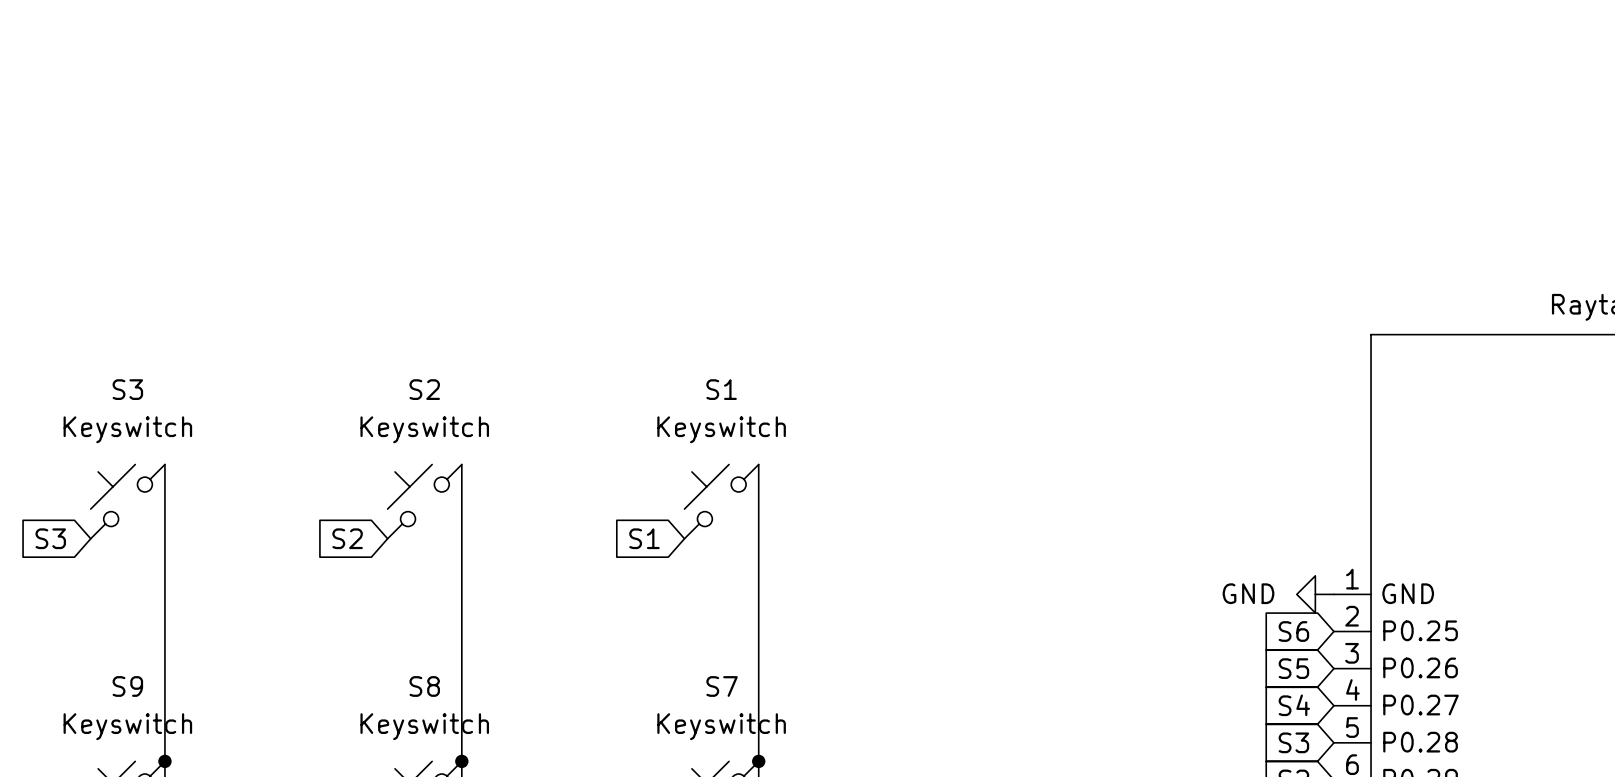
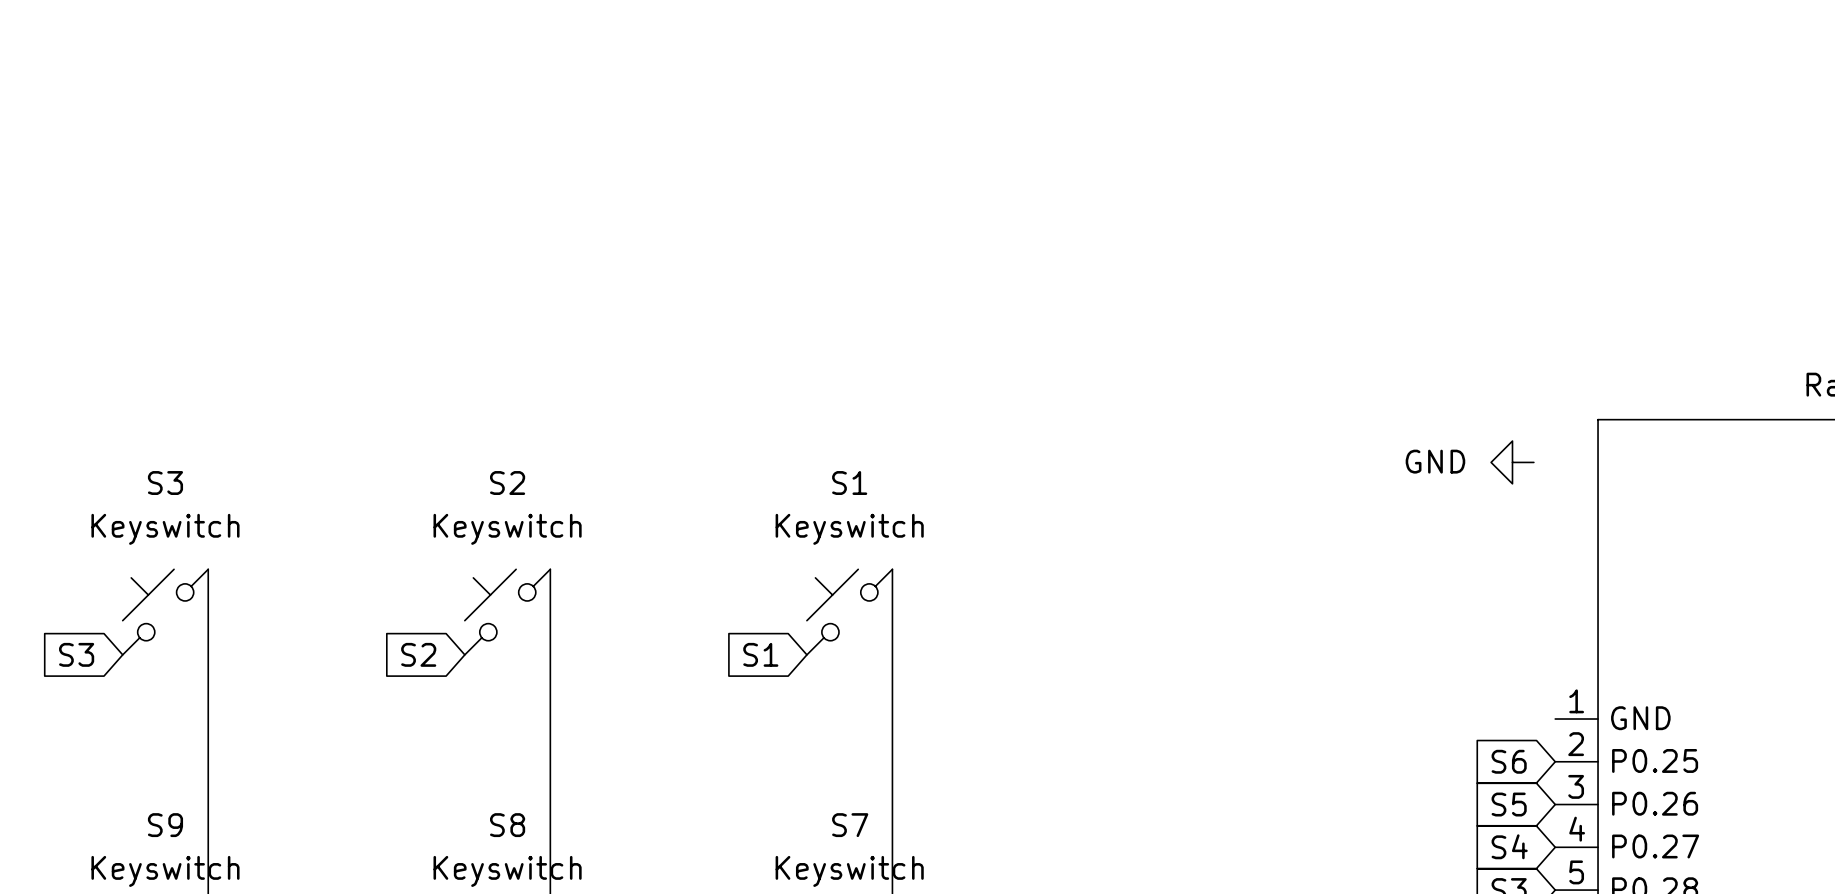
power symbol: none -> GND (1512, 462)
power symbol: GND (1315, 594) -> none

